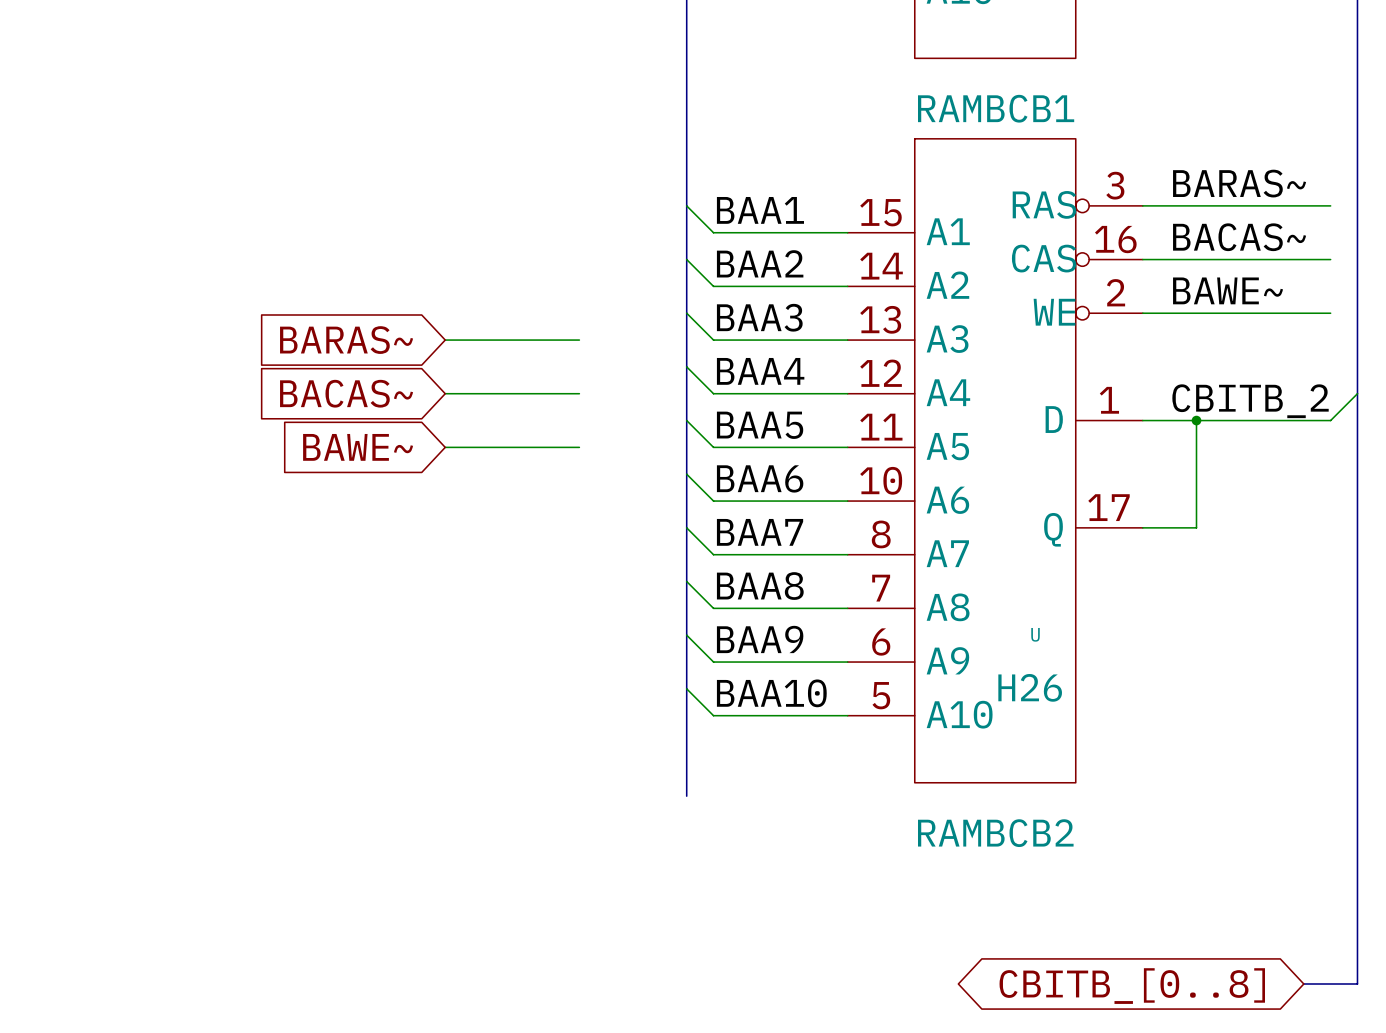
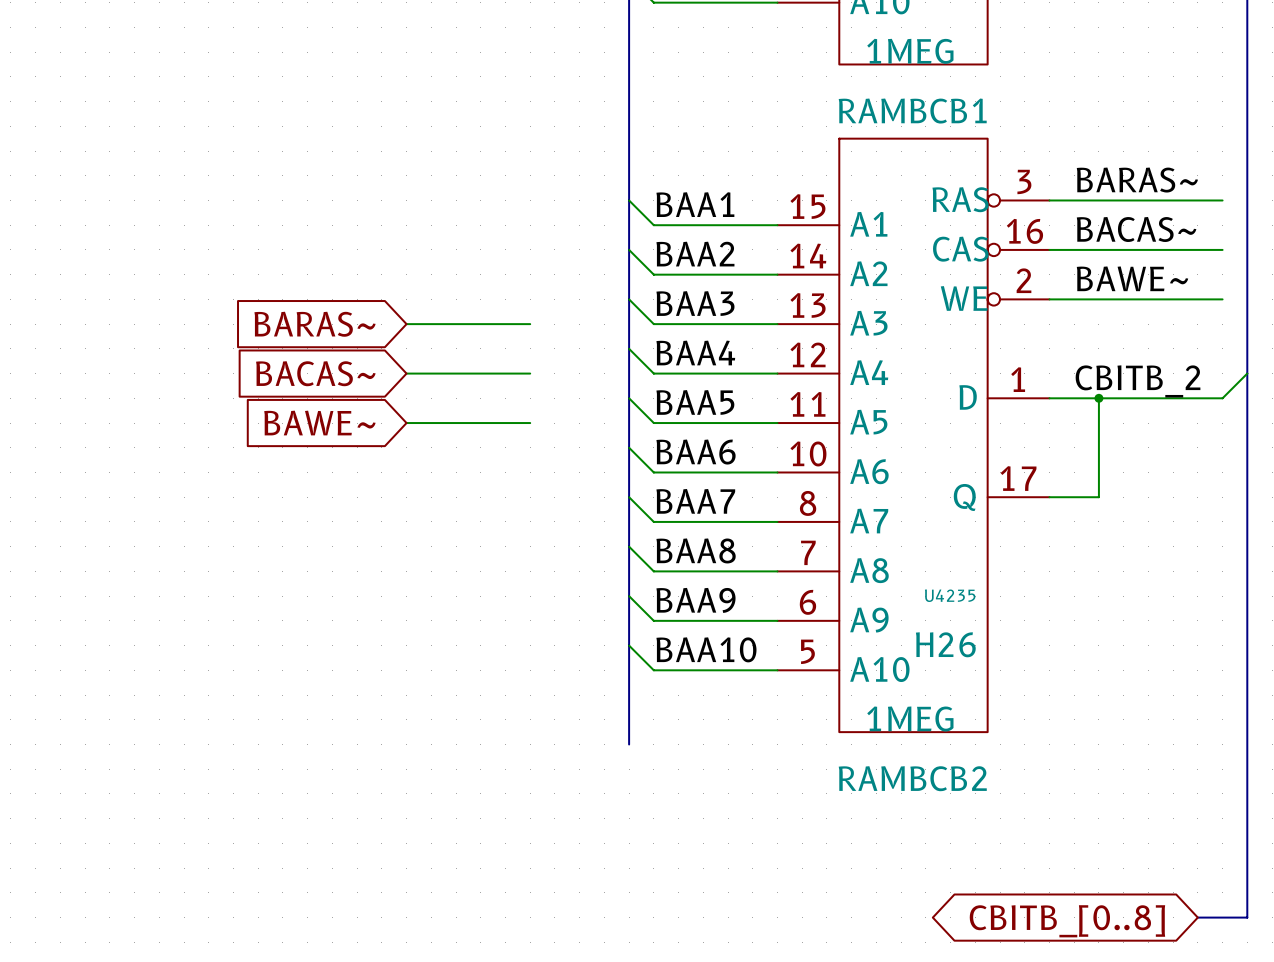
part value: none -> 1MEG (910, 51)
U name: U (1035, 634) -> U4235 (950, 595)
U value: none -> 1MEG (910, 718)

